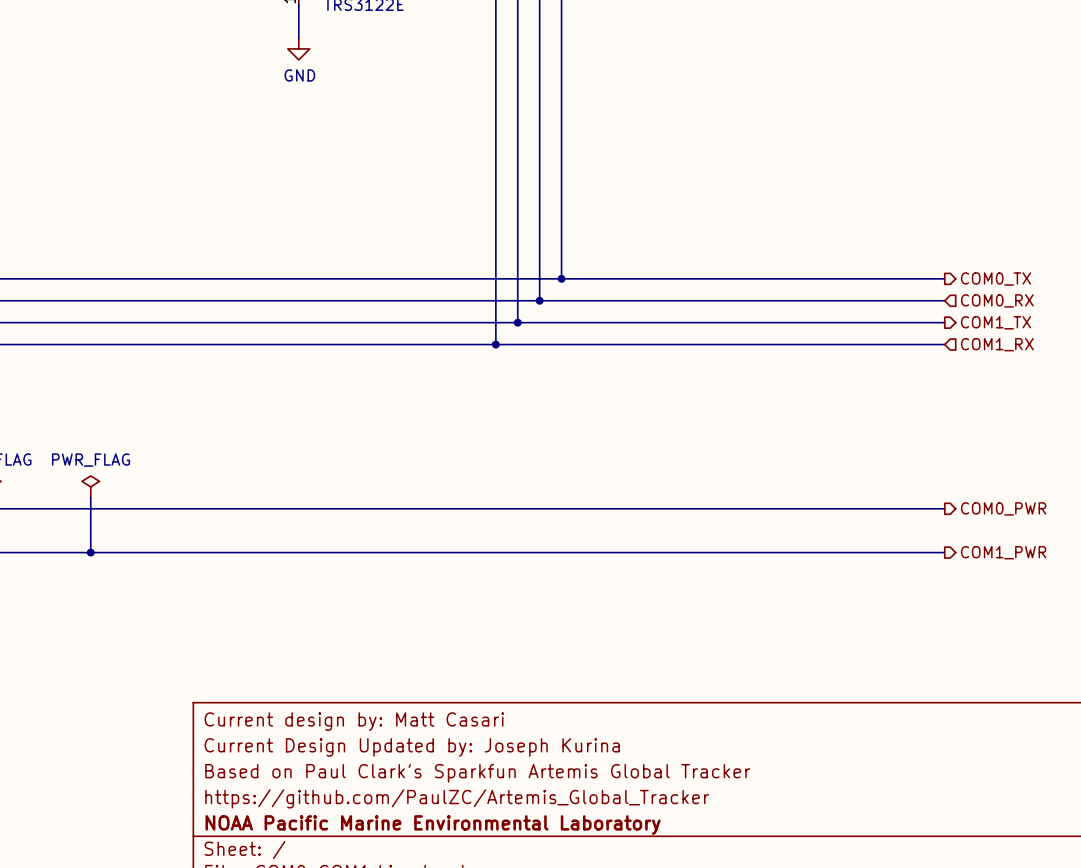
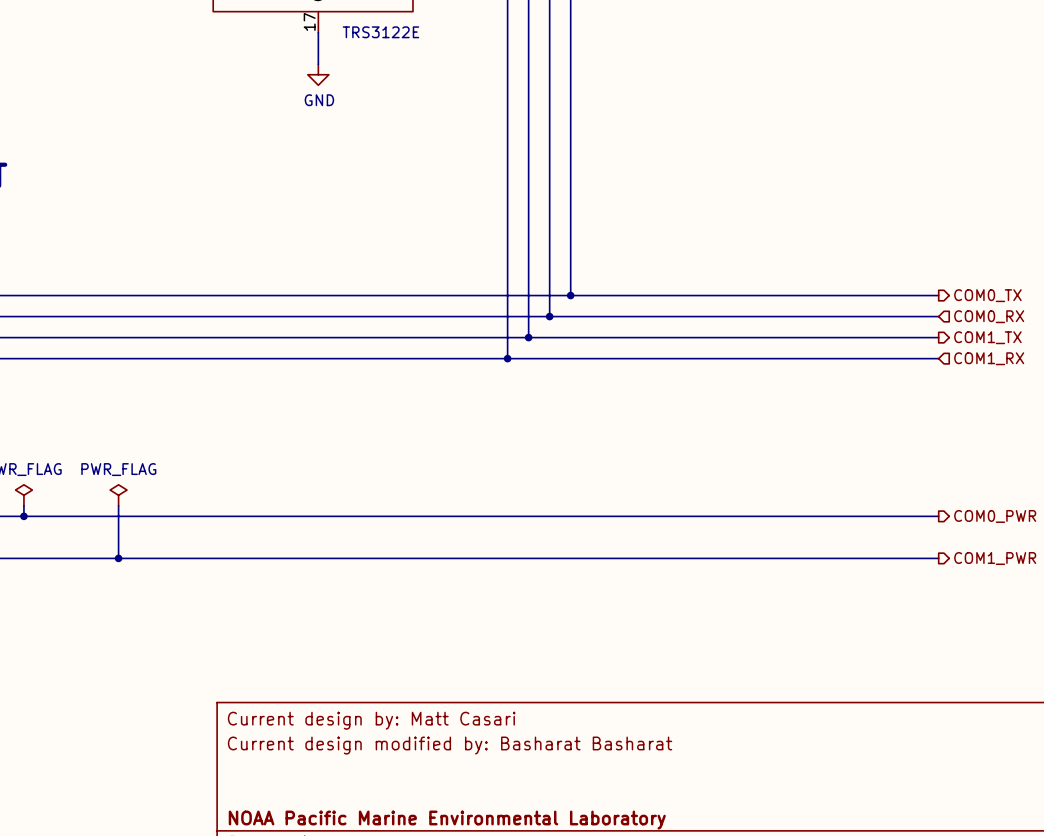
title block: Current Design Updated by: Joseph Kurina (412, 747) -> Current design modified by: Basharat Basharat (450, 745)
title block: Based on Paul Clark's Sparkfun Artemis Global Tracker (477, 773) -> none
title block: https://github.com/PaulZC/Artemis_Global_Tracker (457, 798) -> none

